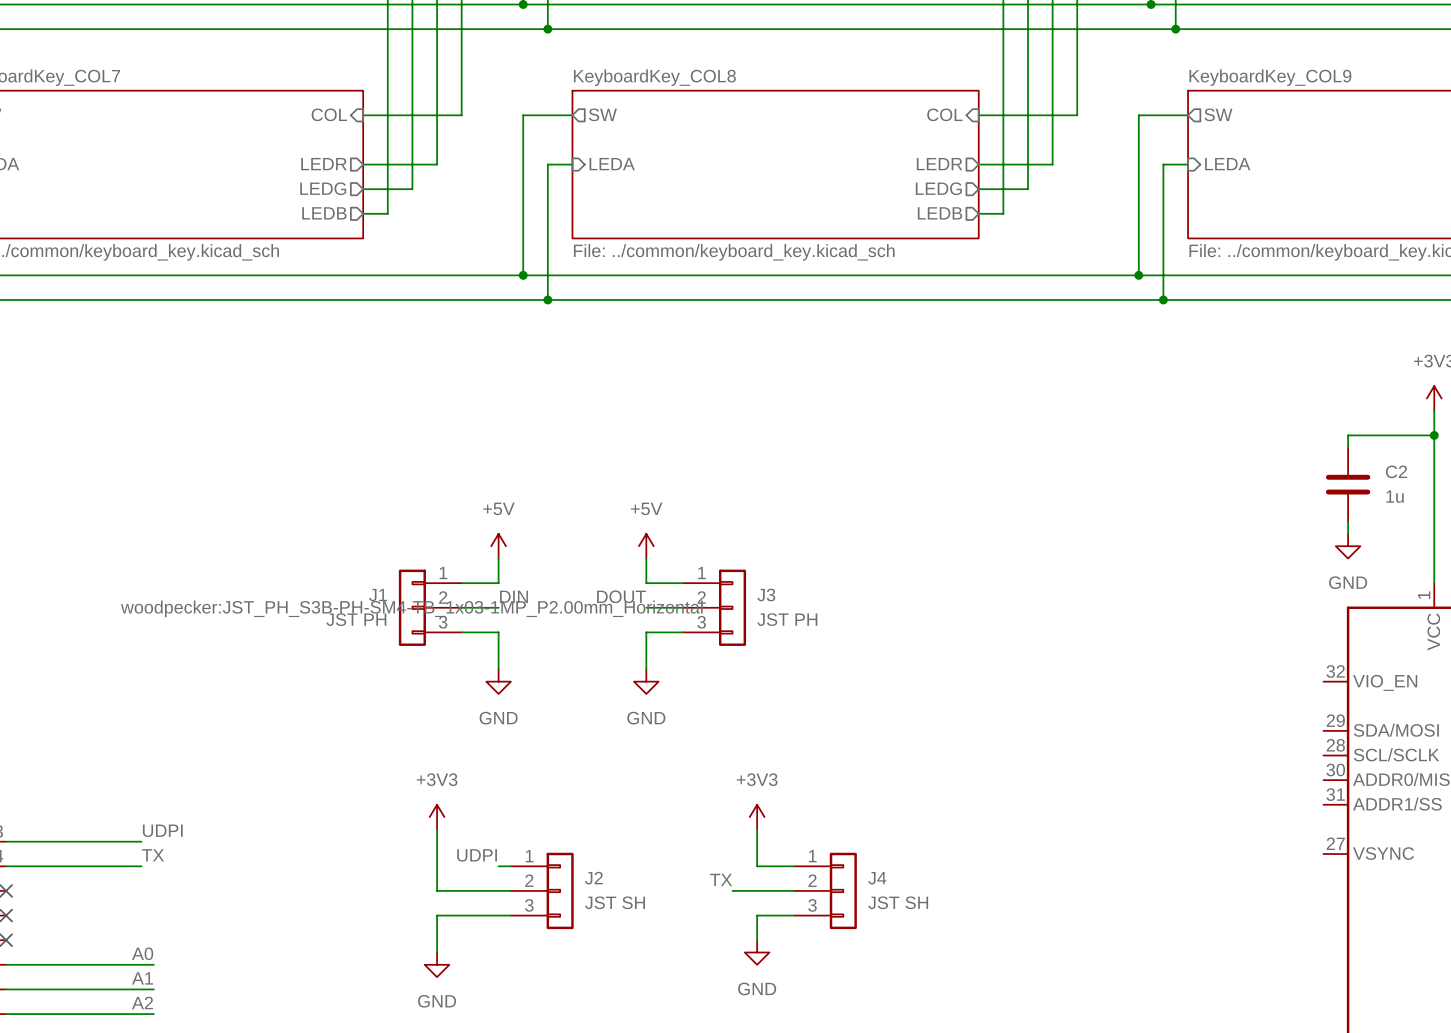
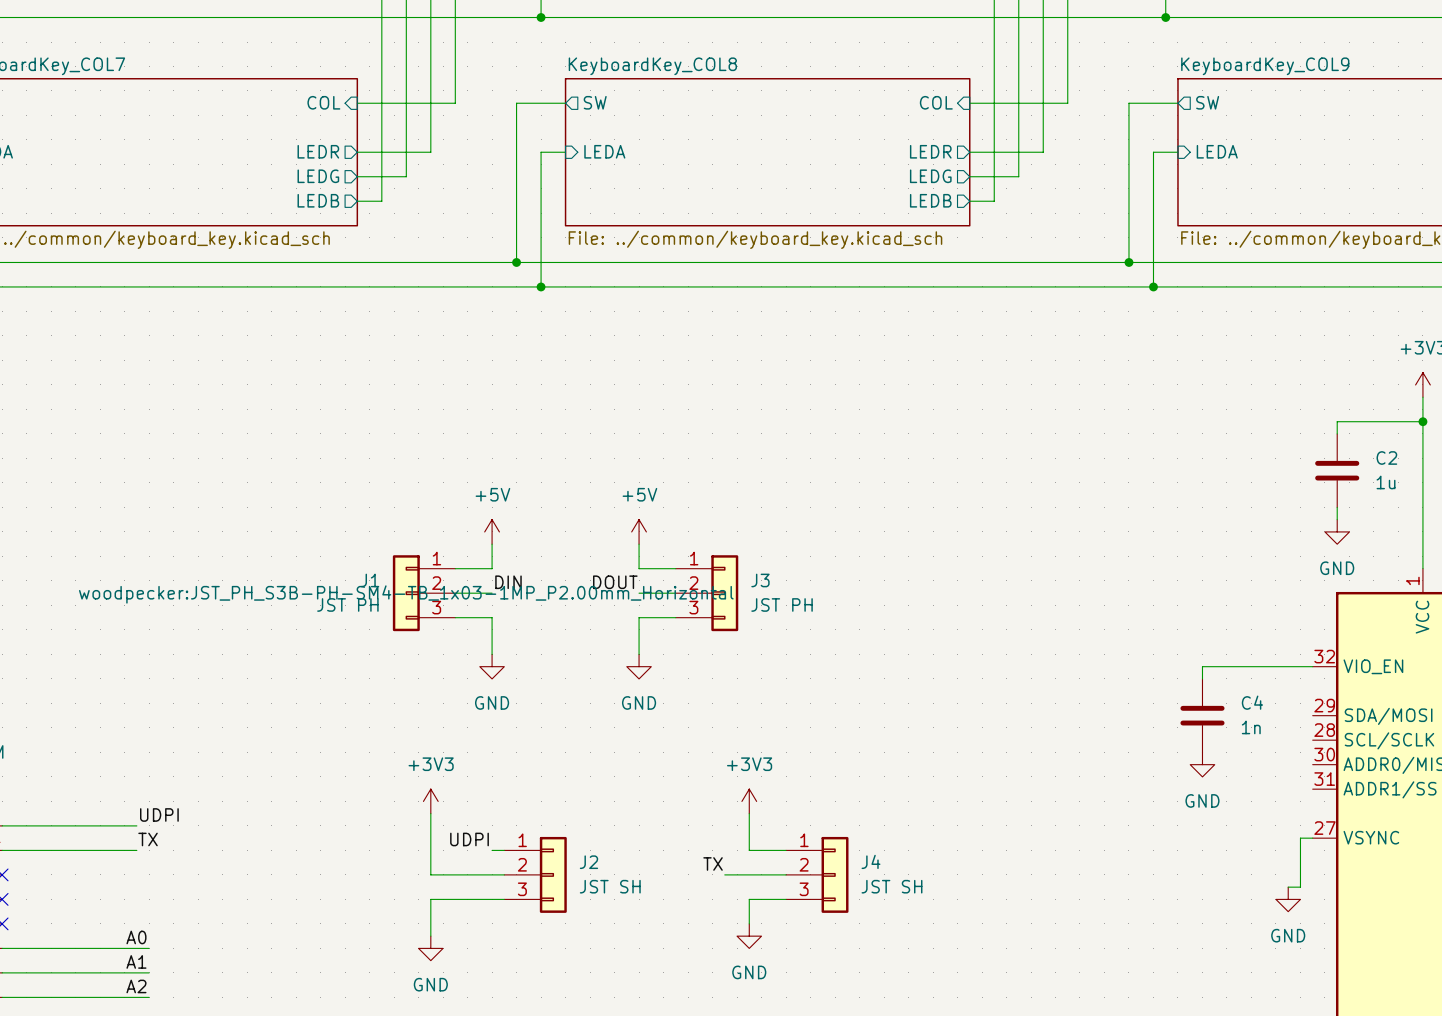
wire: none -> (1312, 666) (1202, 666) (1202, 678)
C4: none -> 1n (1202, 715)
power symbol: none -> GND (1202, 764)
wire: none -> (1312, 838) (1300, 838) (1300, 887) (1288, 887)
power symbol: none -> GND (1288, 899)

